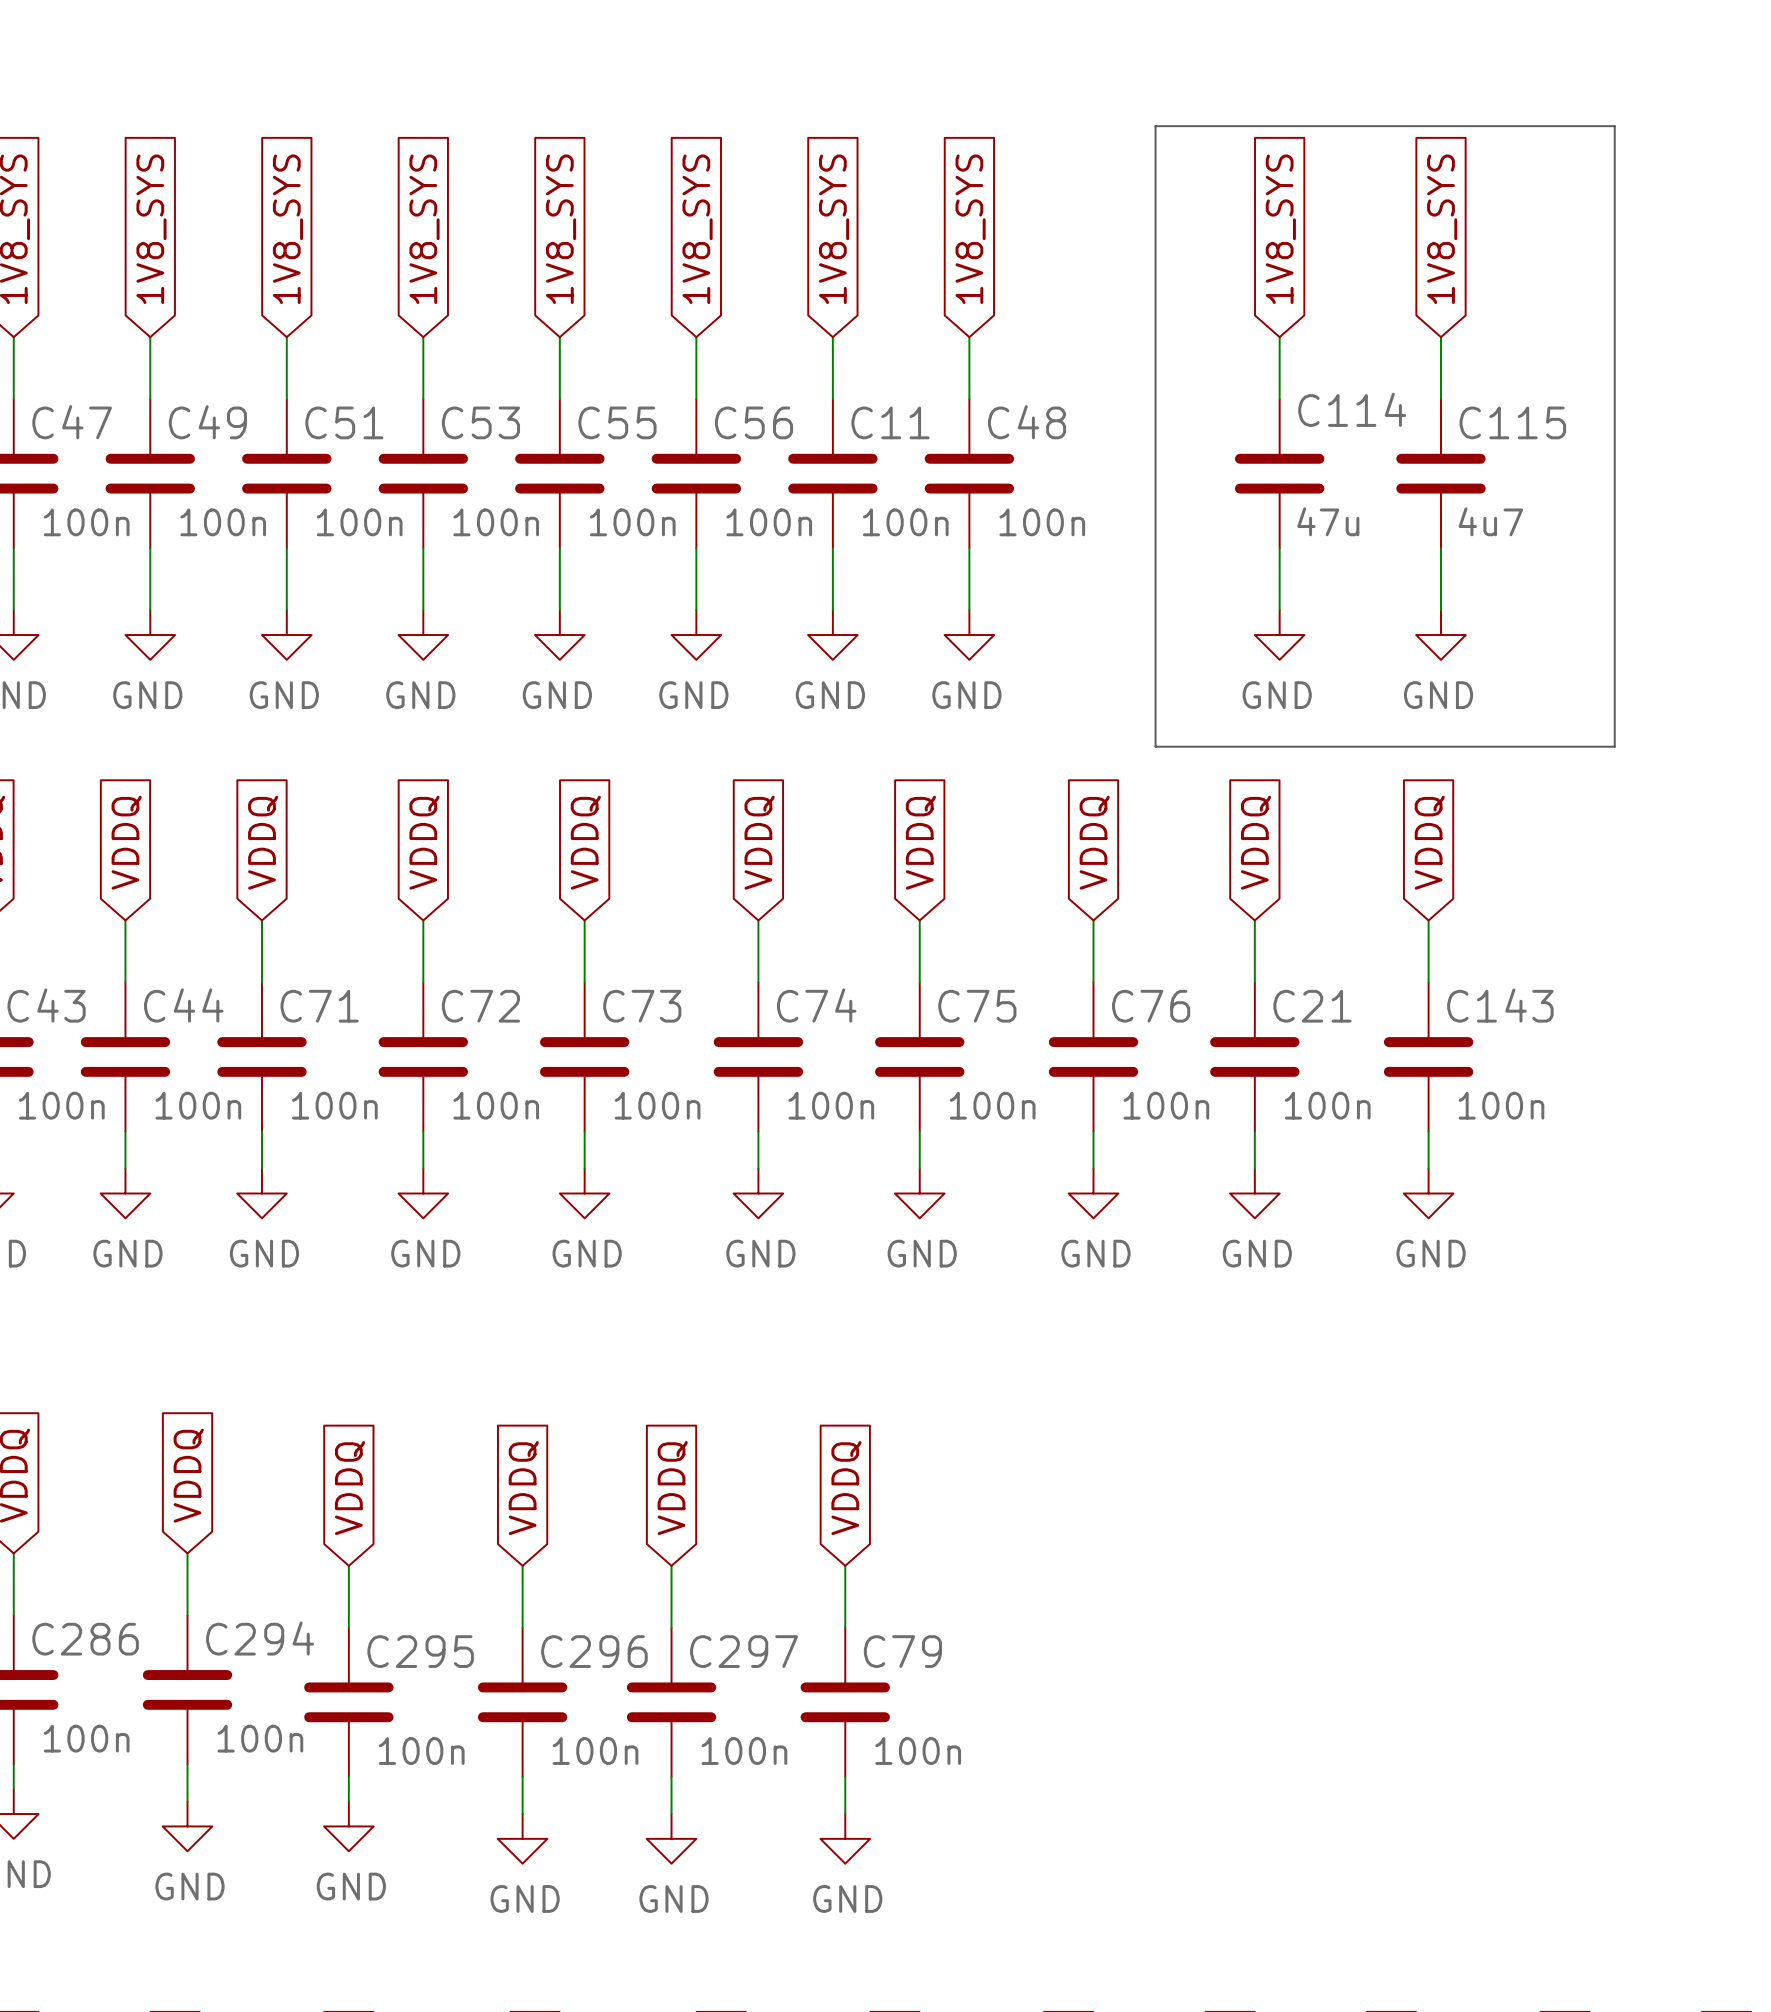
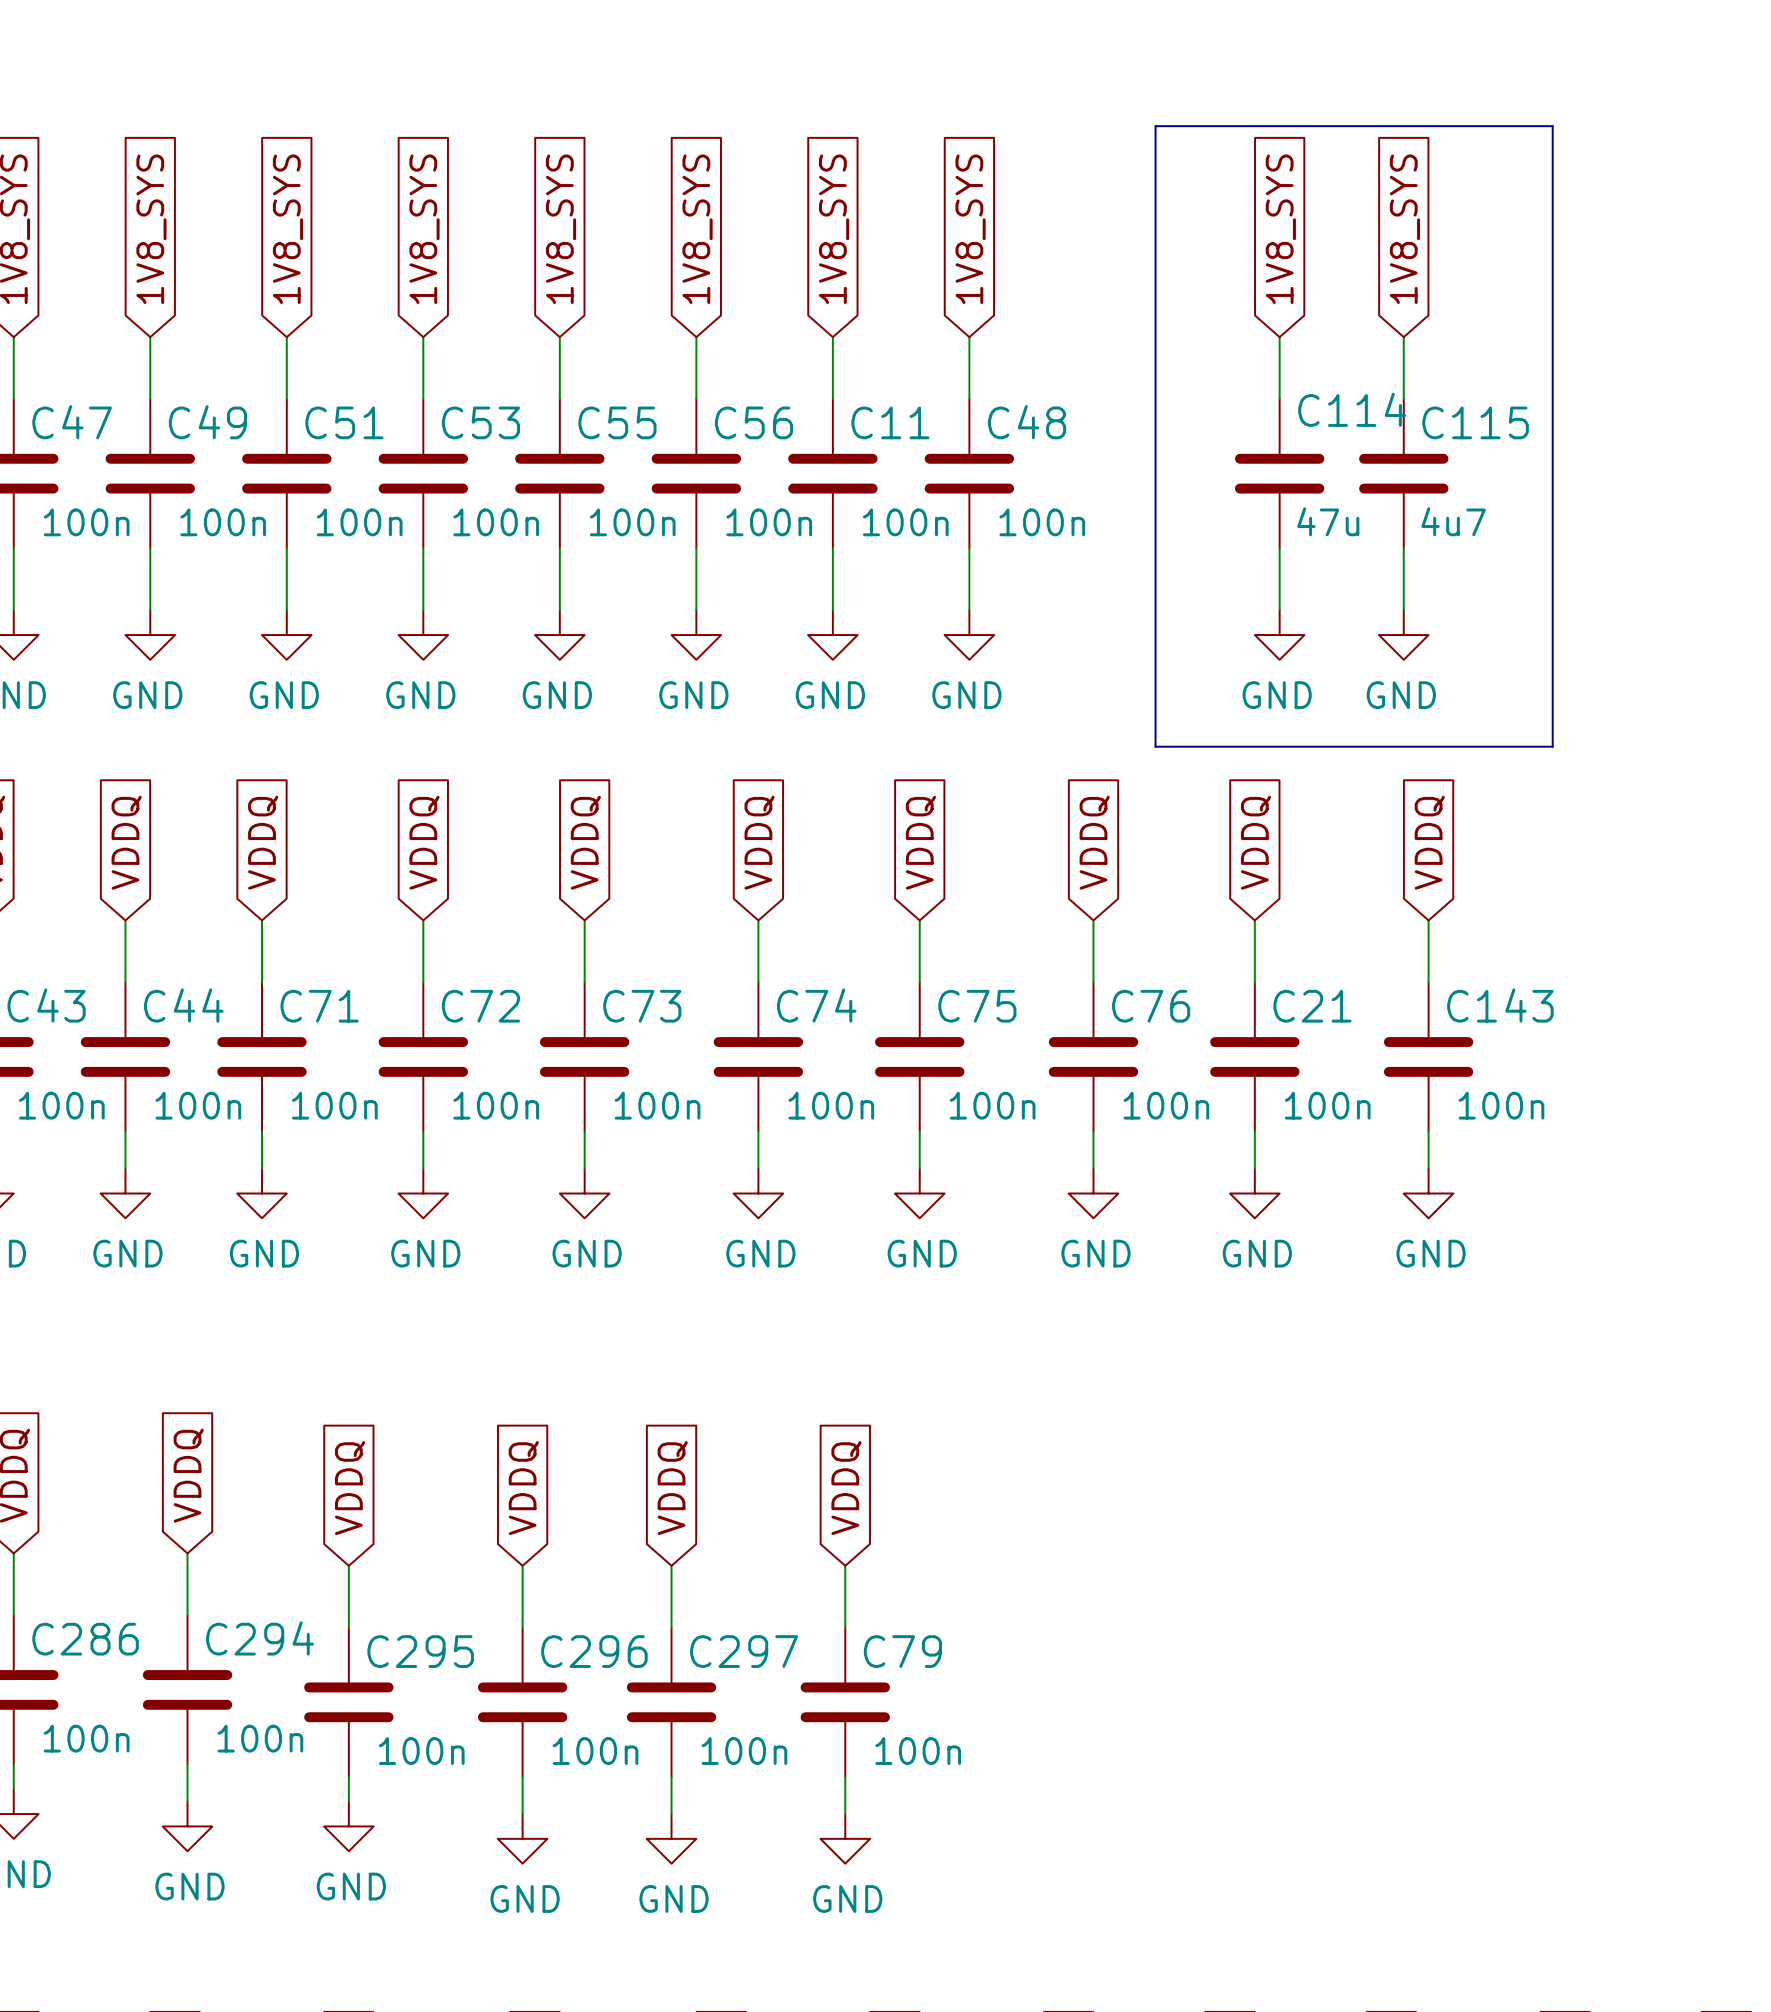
line: (1552, 126) (1614, 126) (1614, 746) (1552, 746) -> (1552, 126) (1552, 746)
global label position: 1V8_SYS (1442, 229) -> 1V8_SYS (1404, 229)
wire: (1441, 337) (1441, 399) -> (1403, 337) (1403, 399)
C115 position: (1441, 473) -> (1403, 473)
wire: (1441, 548) (1441, 610) -> (1403, 548) (1403, 610)
power symbol position: GND (1441, 635) -> GND (1403, 635)

